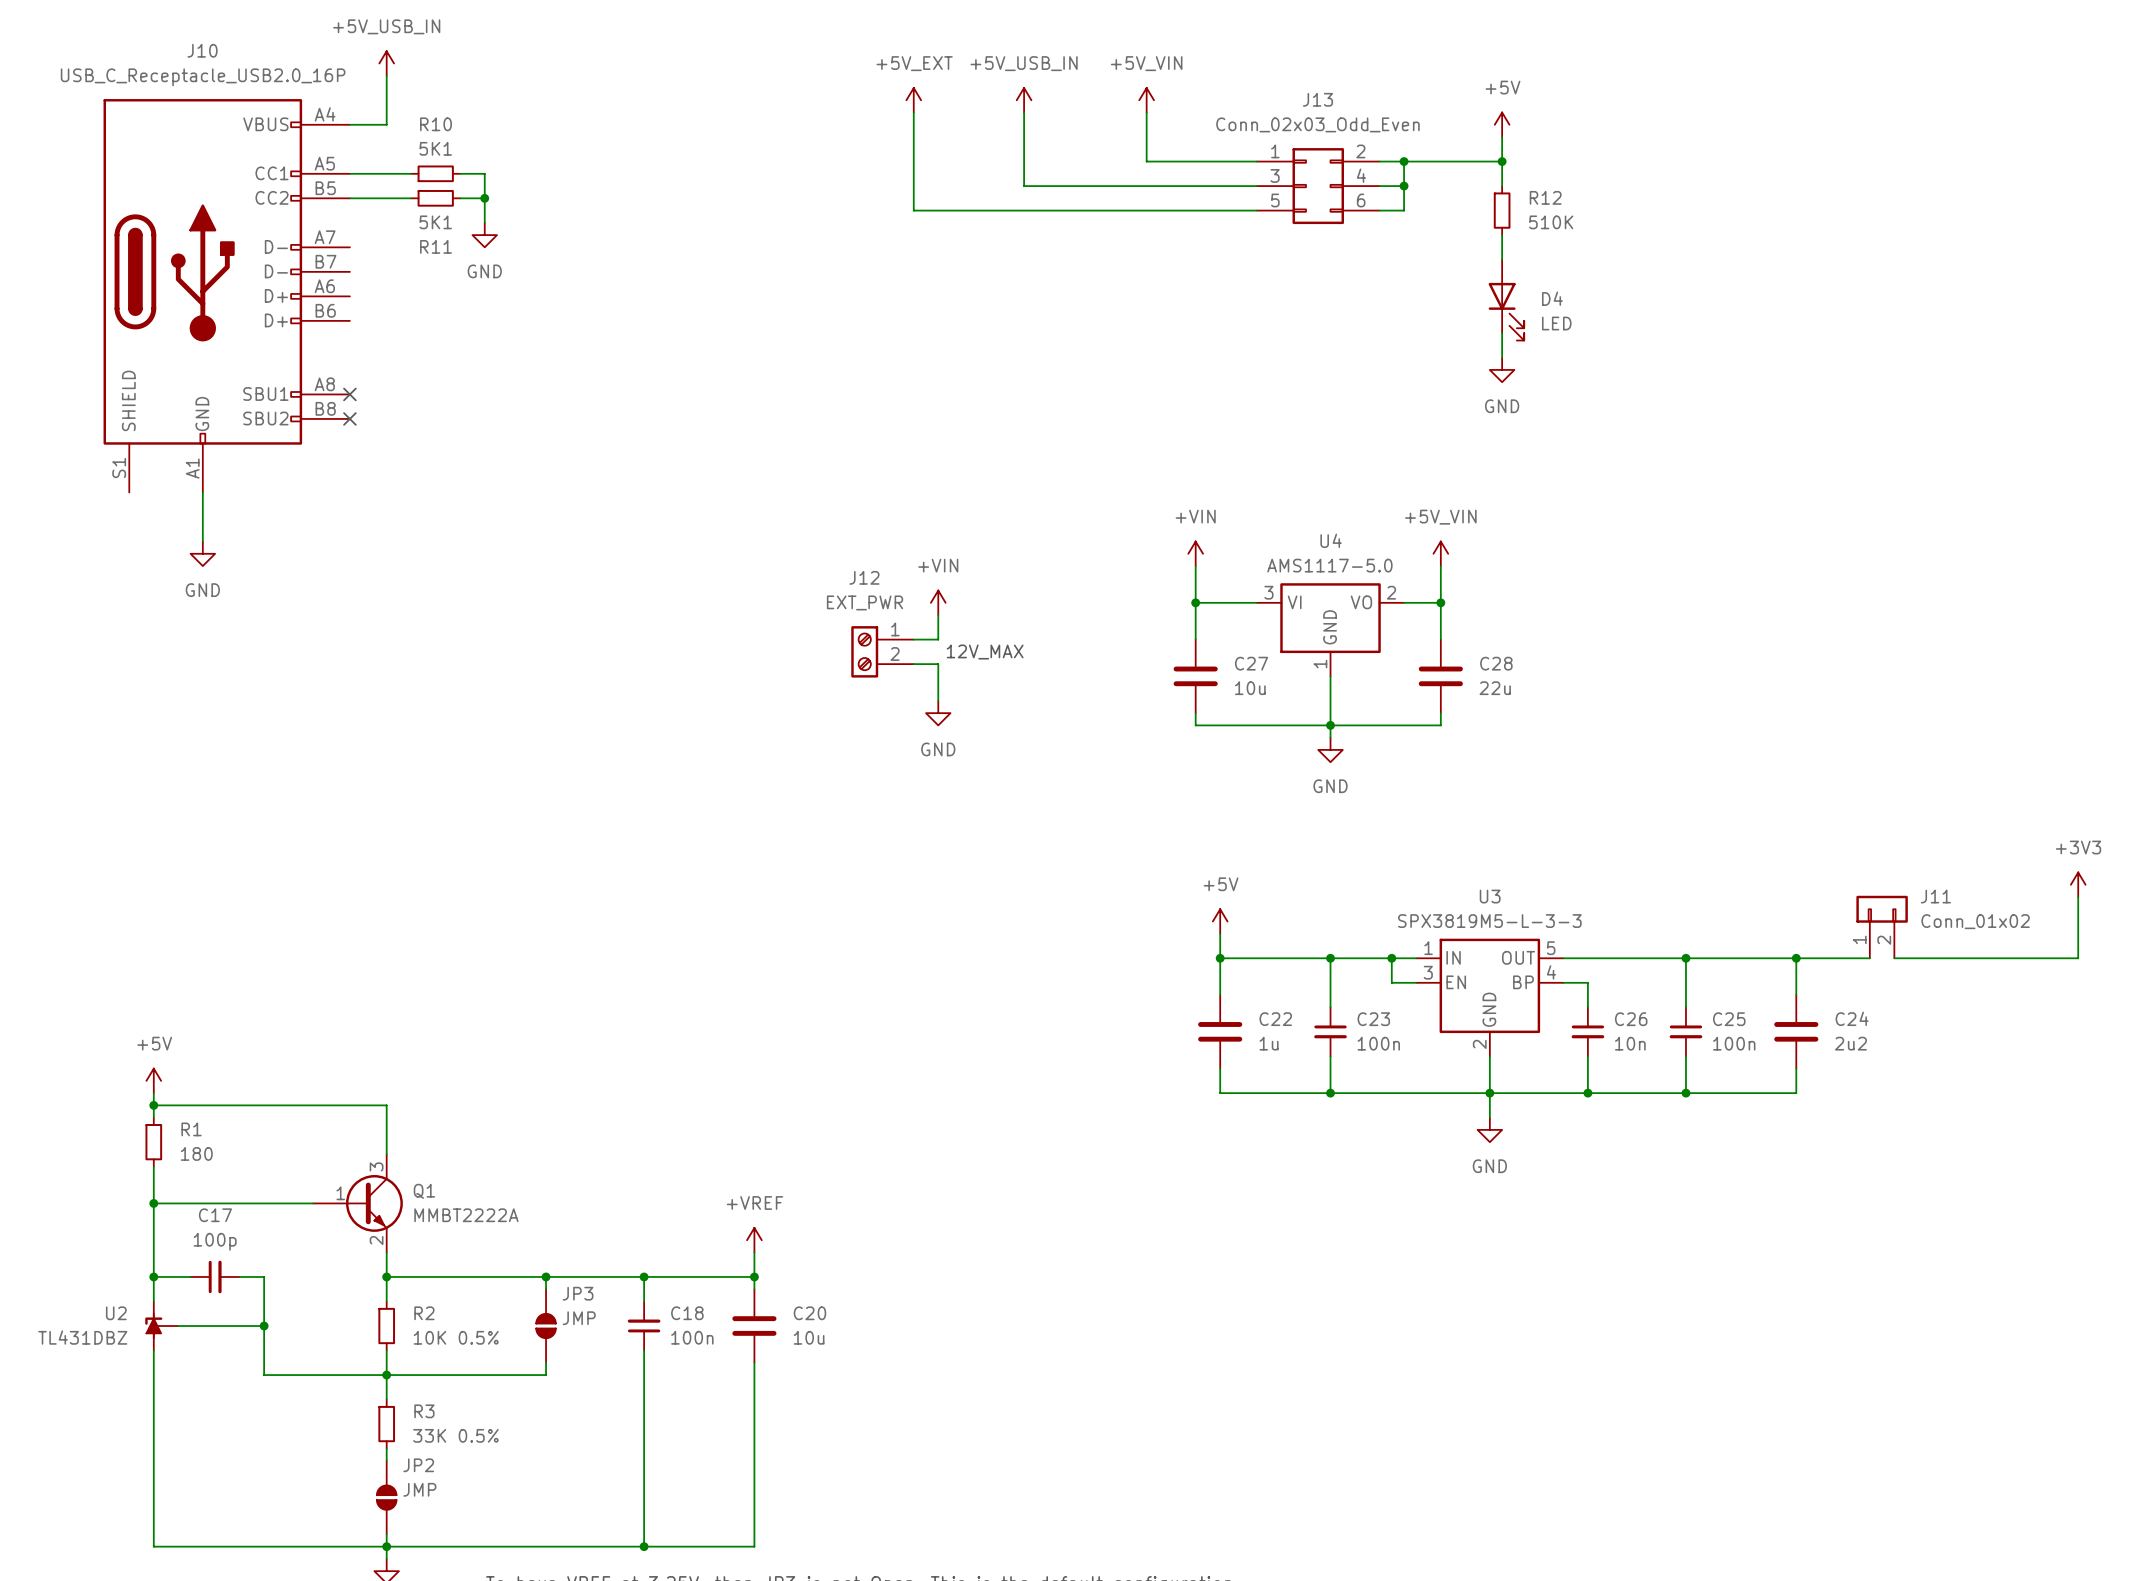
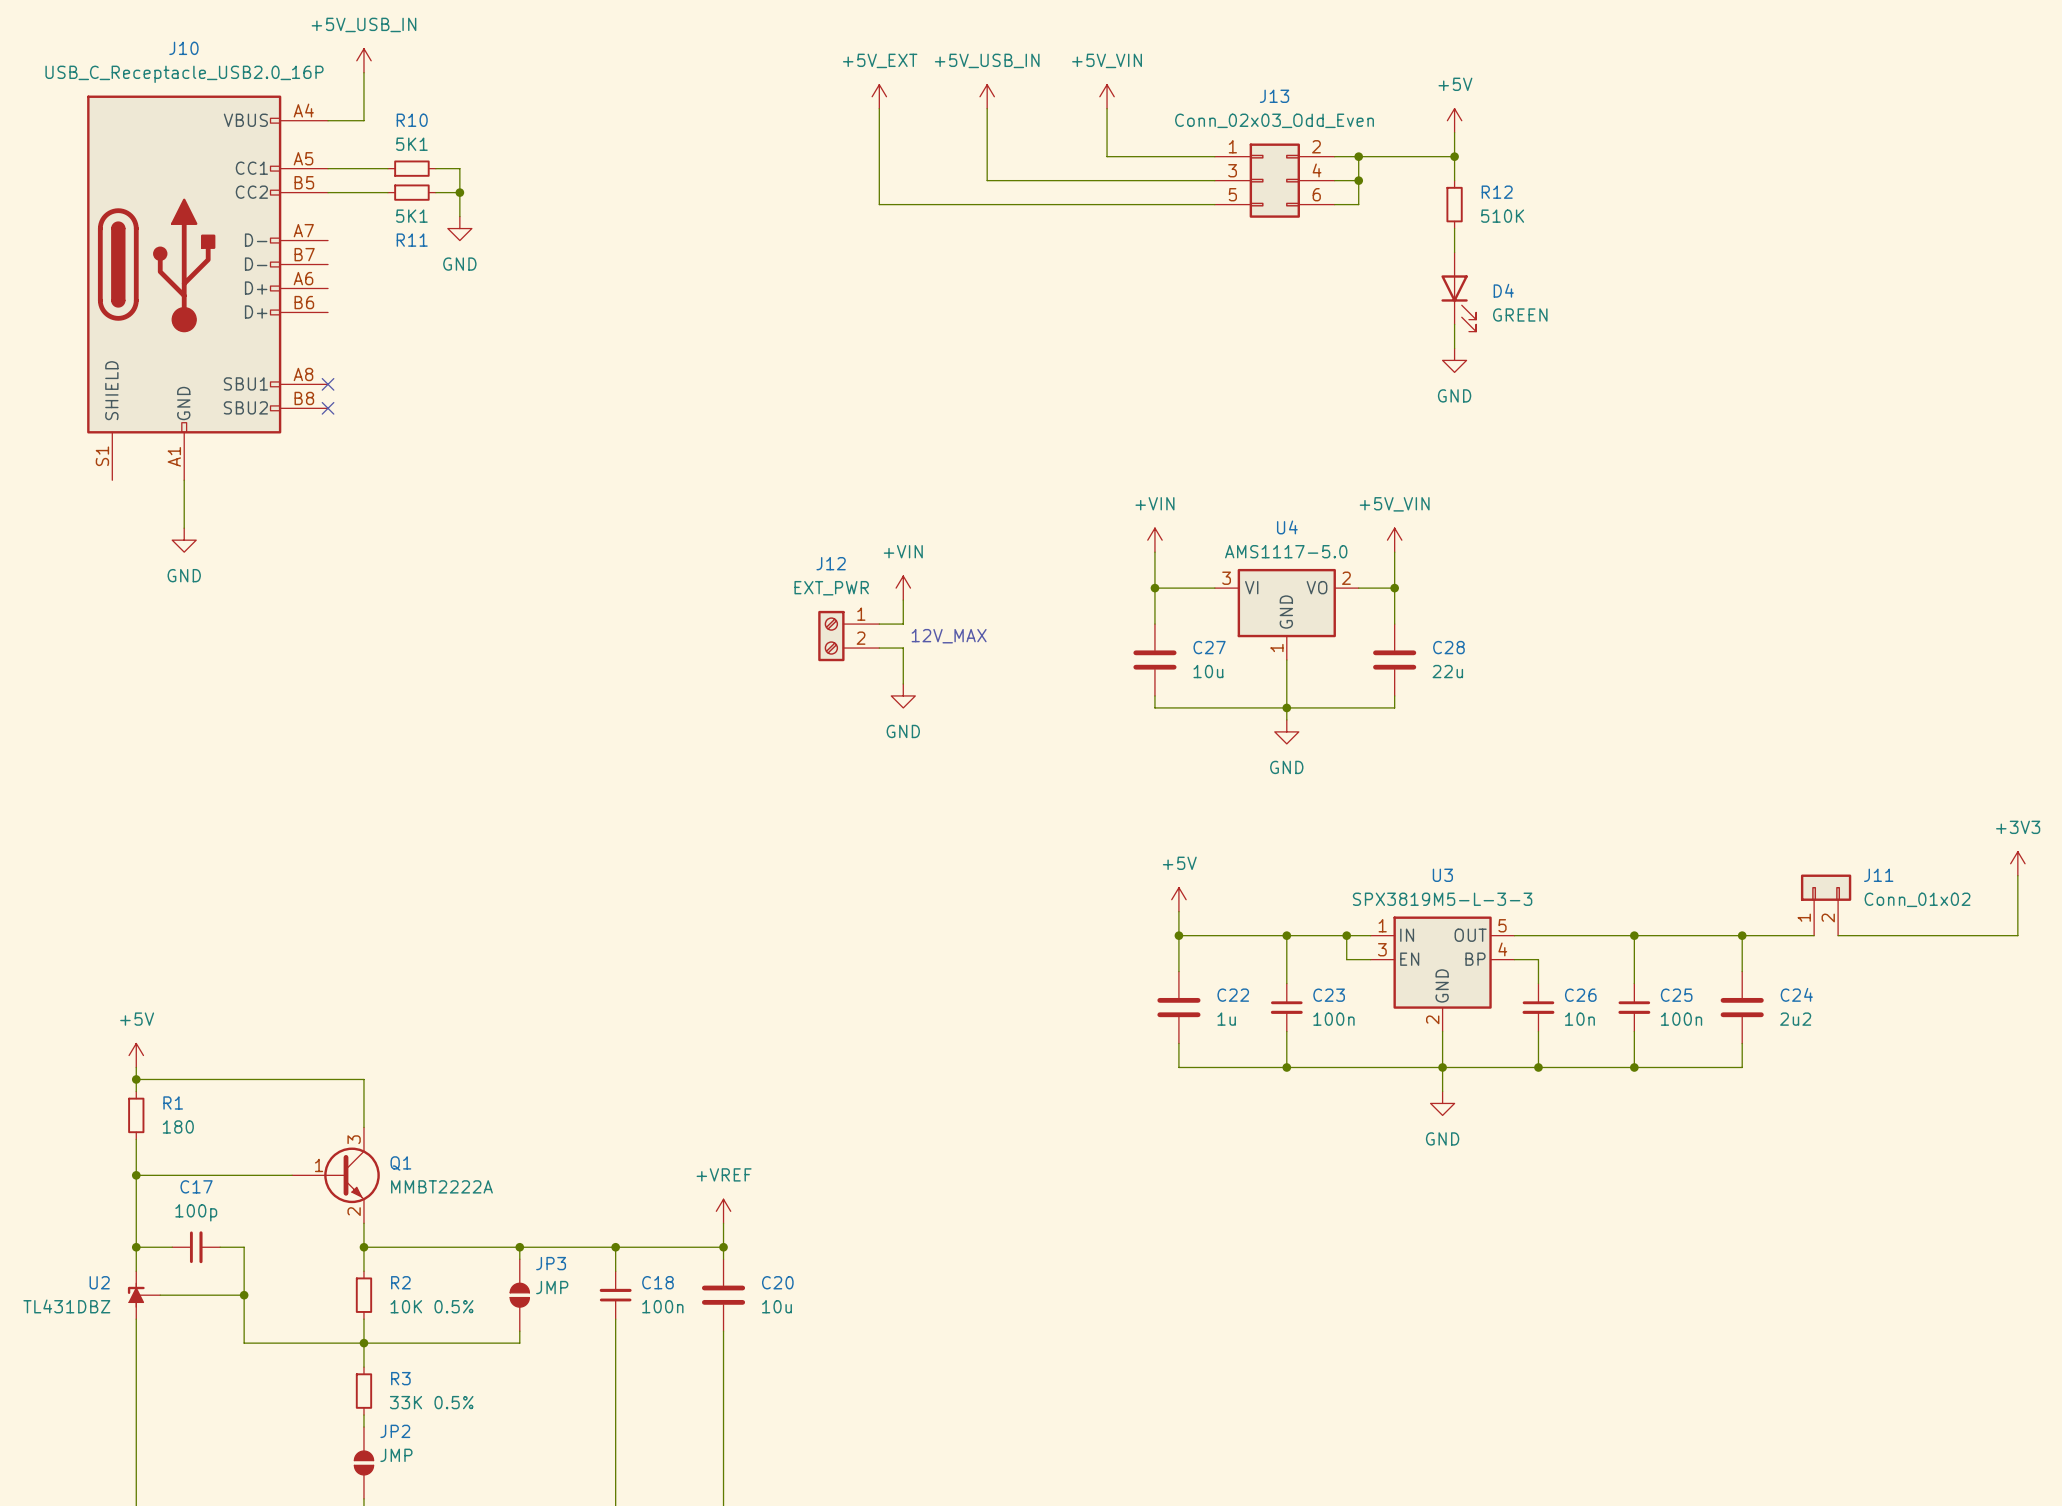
D4 value: LED (1556, 323) -> GREEN (1520, 315)

